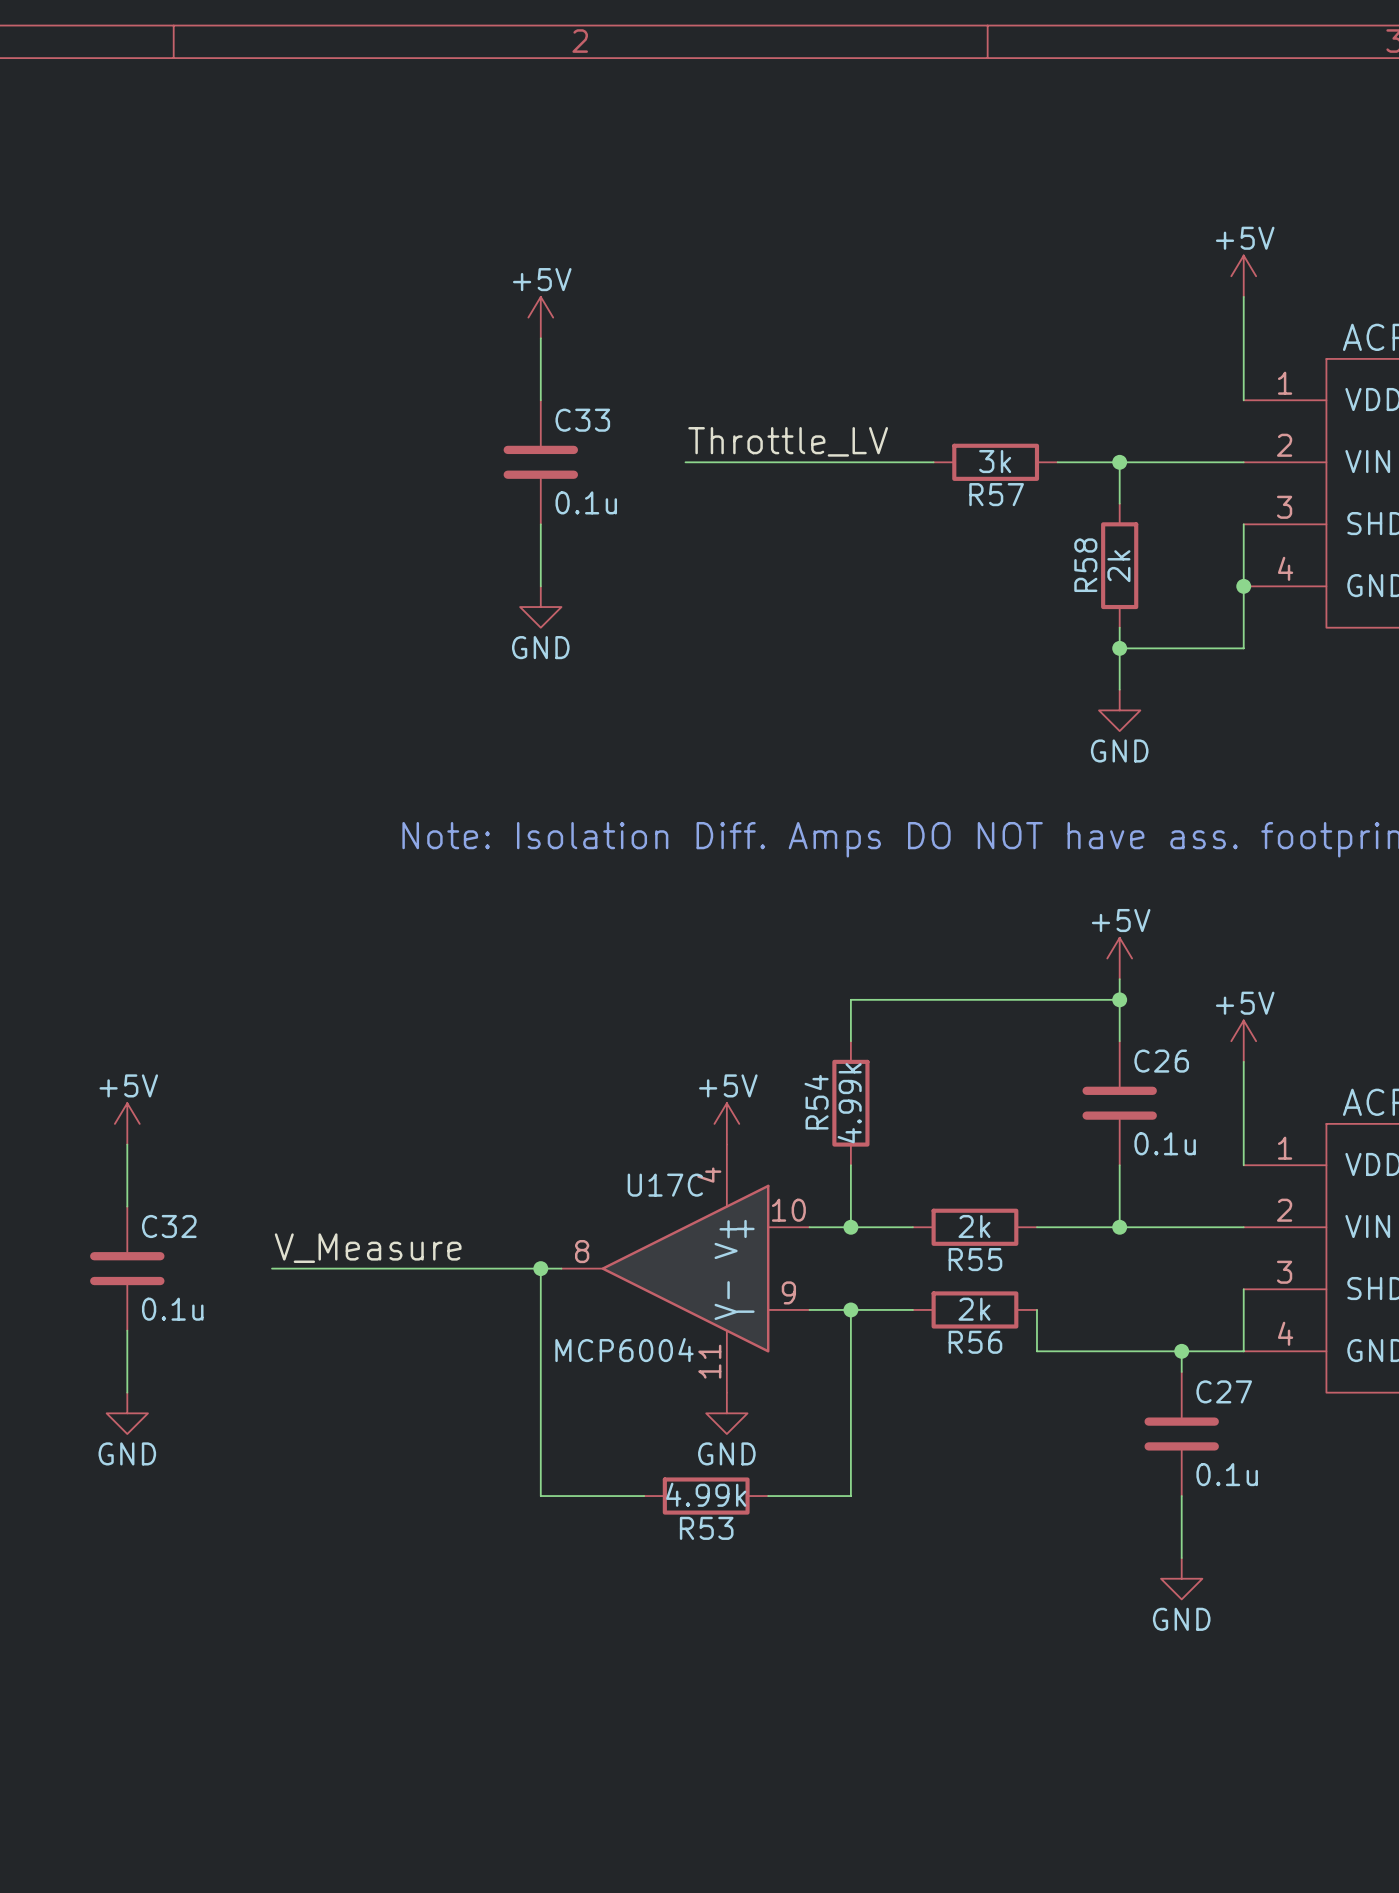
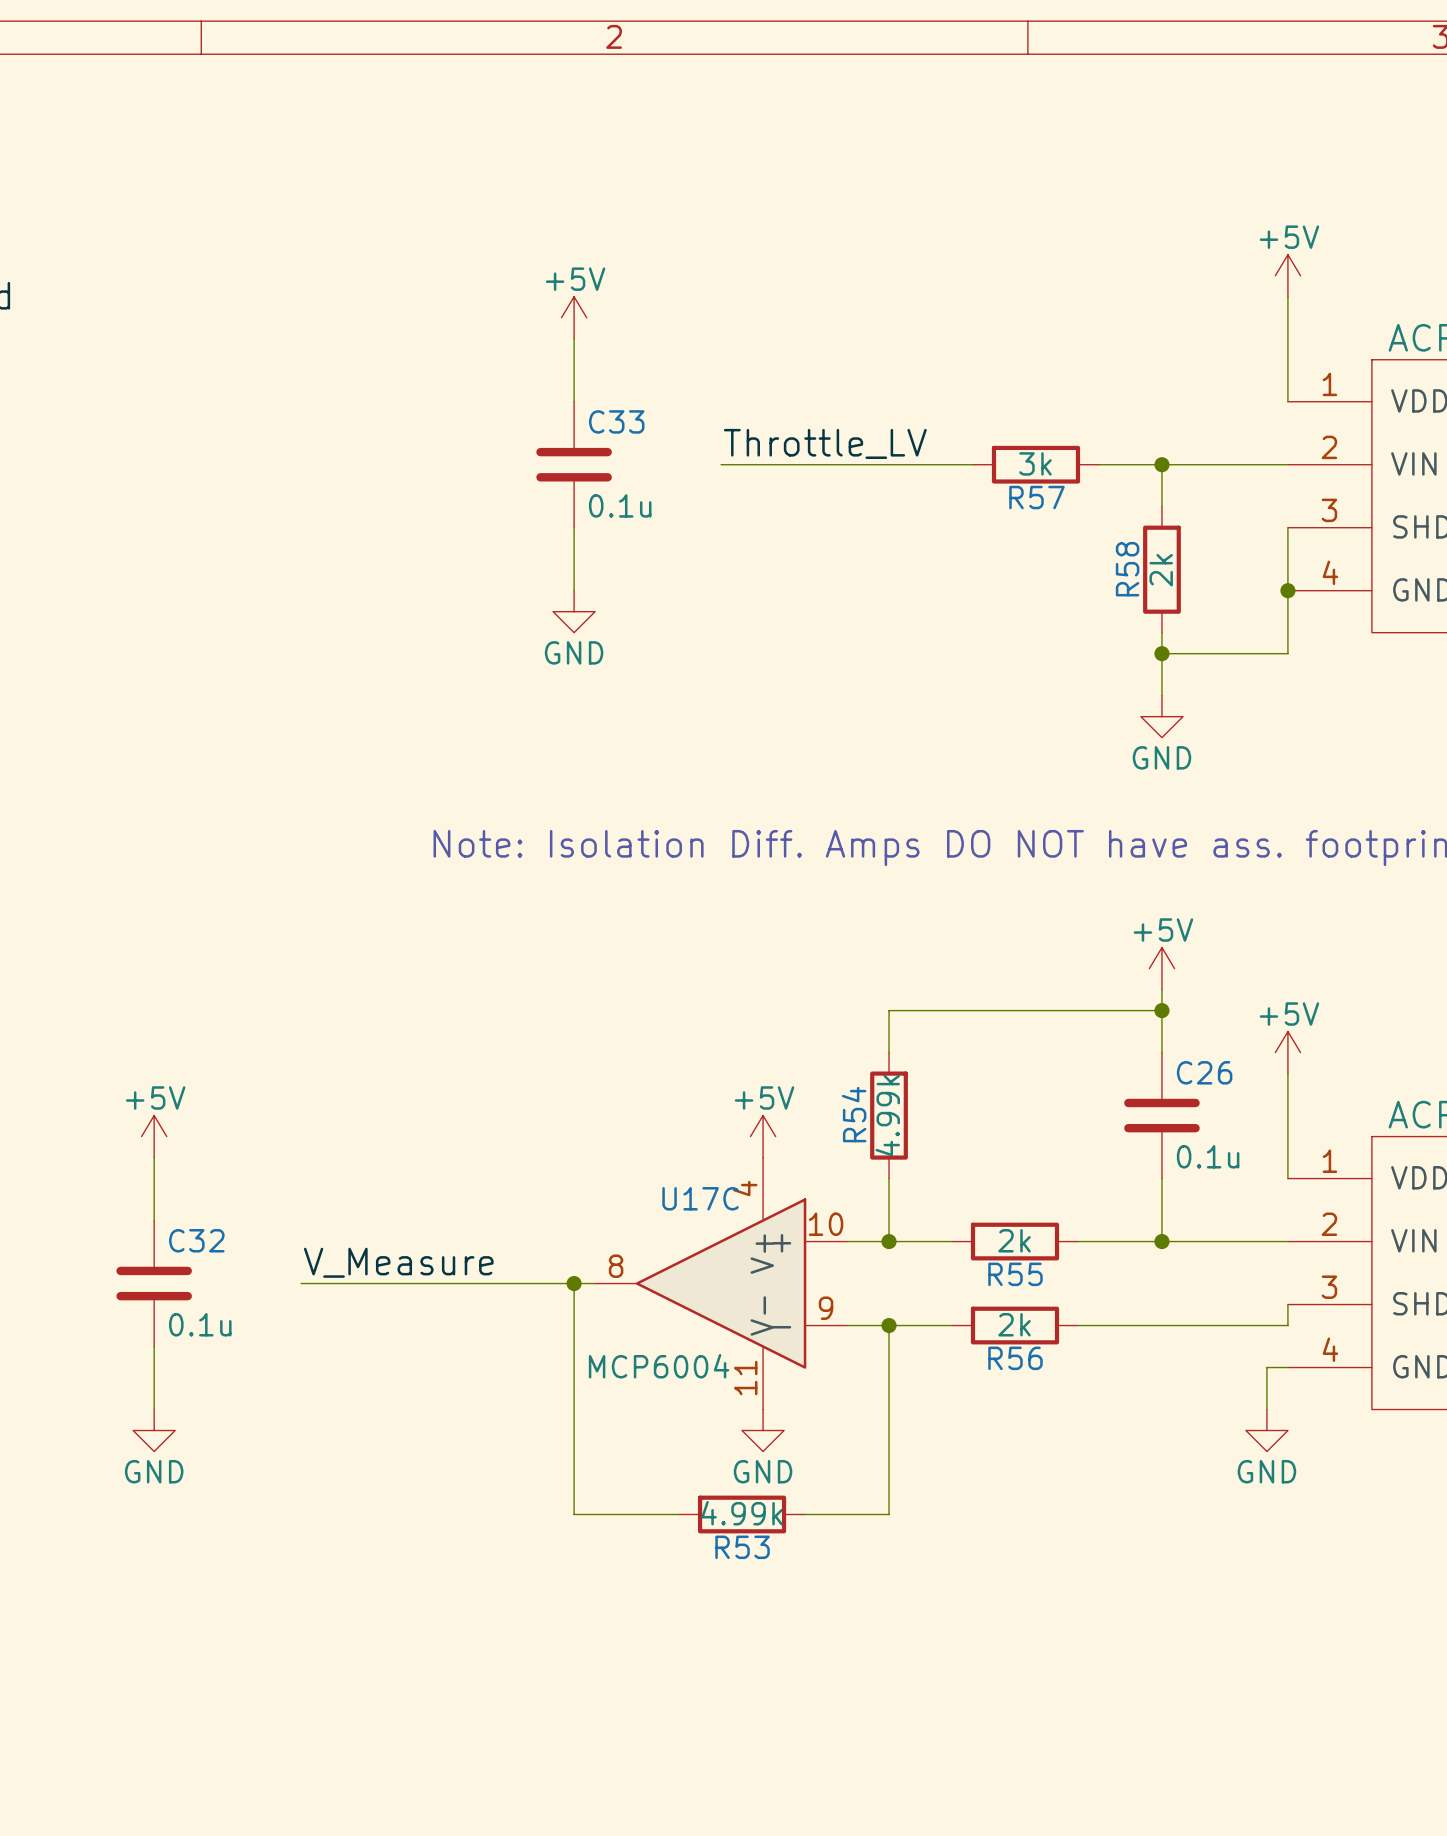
wire: (1036, 1309) (1036, 1351) (1223, 1351) -> (1077, 1325) (1287, 1325)
wire: (1243, 1309) (1243, 1351) -> (1266, 1367) (1266, 1409)
wire: (1181, 1351) (1181, 1371) -> none
junction: (1181, 1351) -> none
C27: 0.1u (1181, 1434) -> none
wire: (1181, 1496) (1181, 1558) -> none
power symbol position: GND (1181, 1578) -> GND (1266, 1430)

